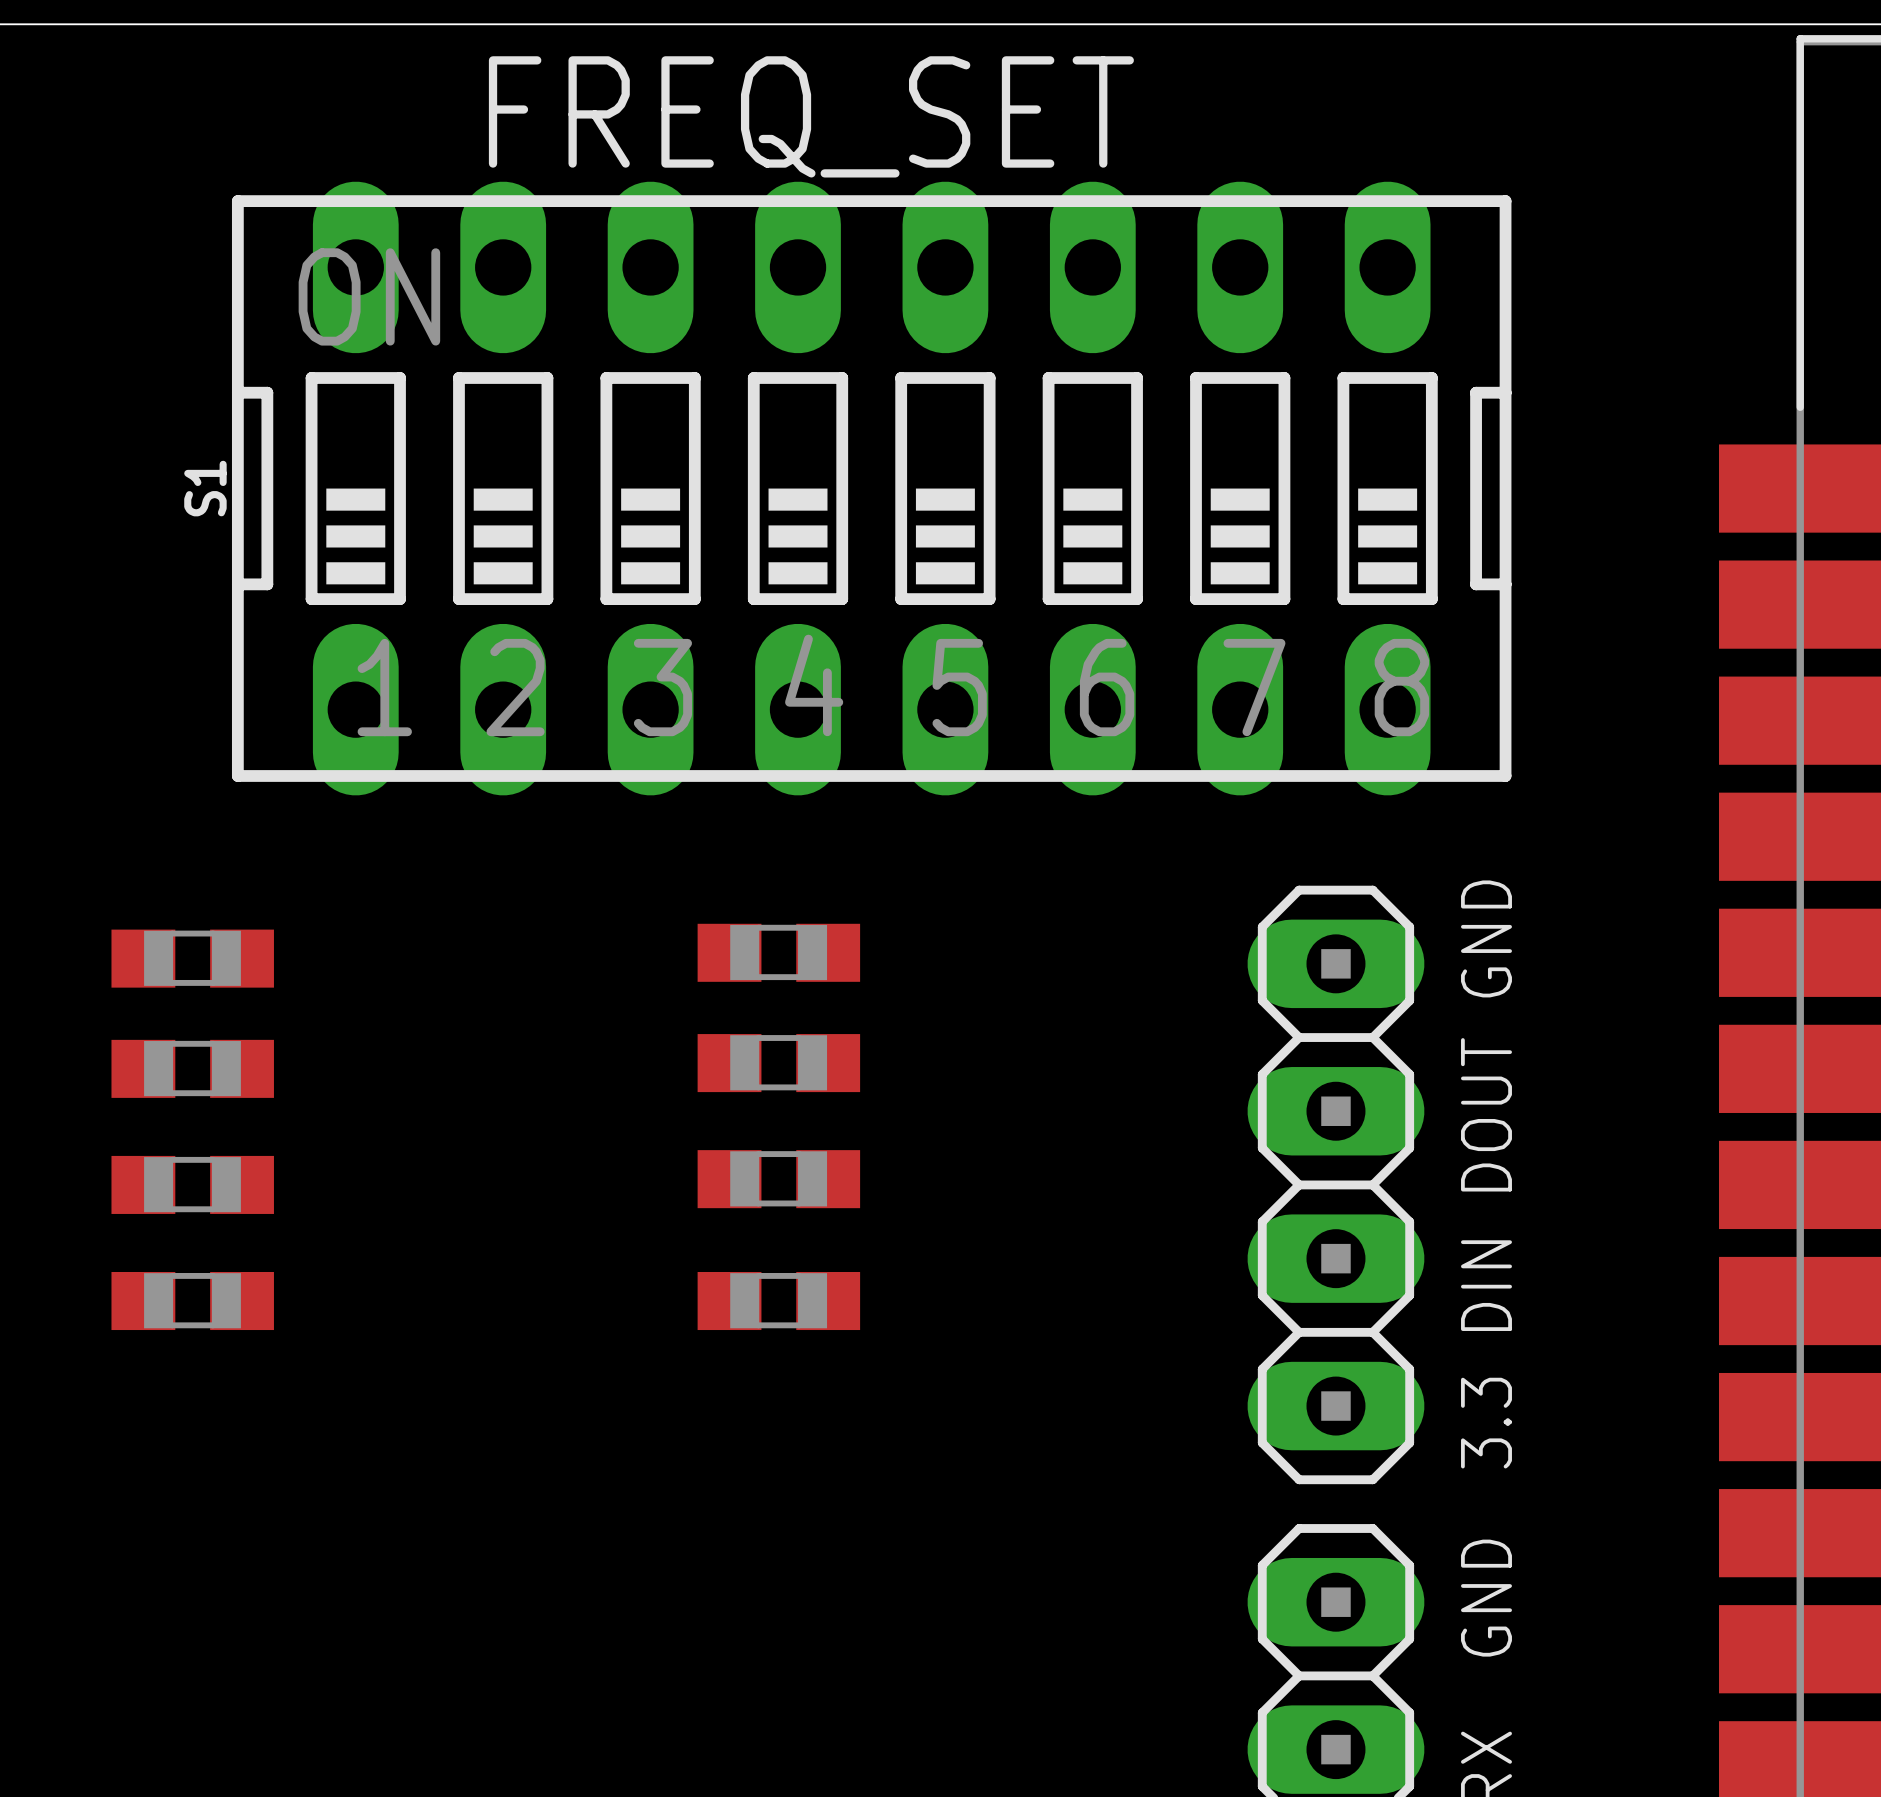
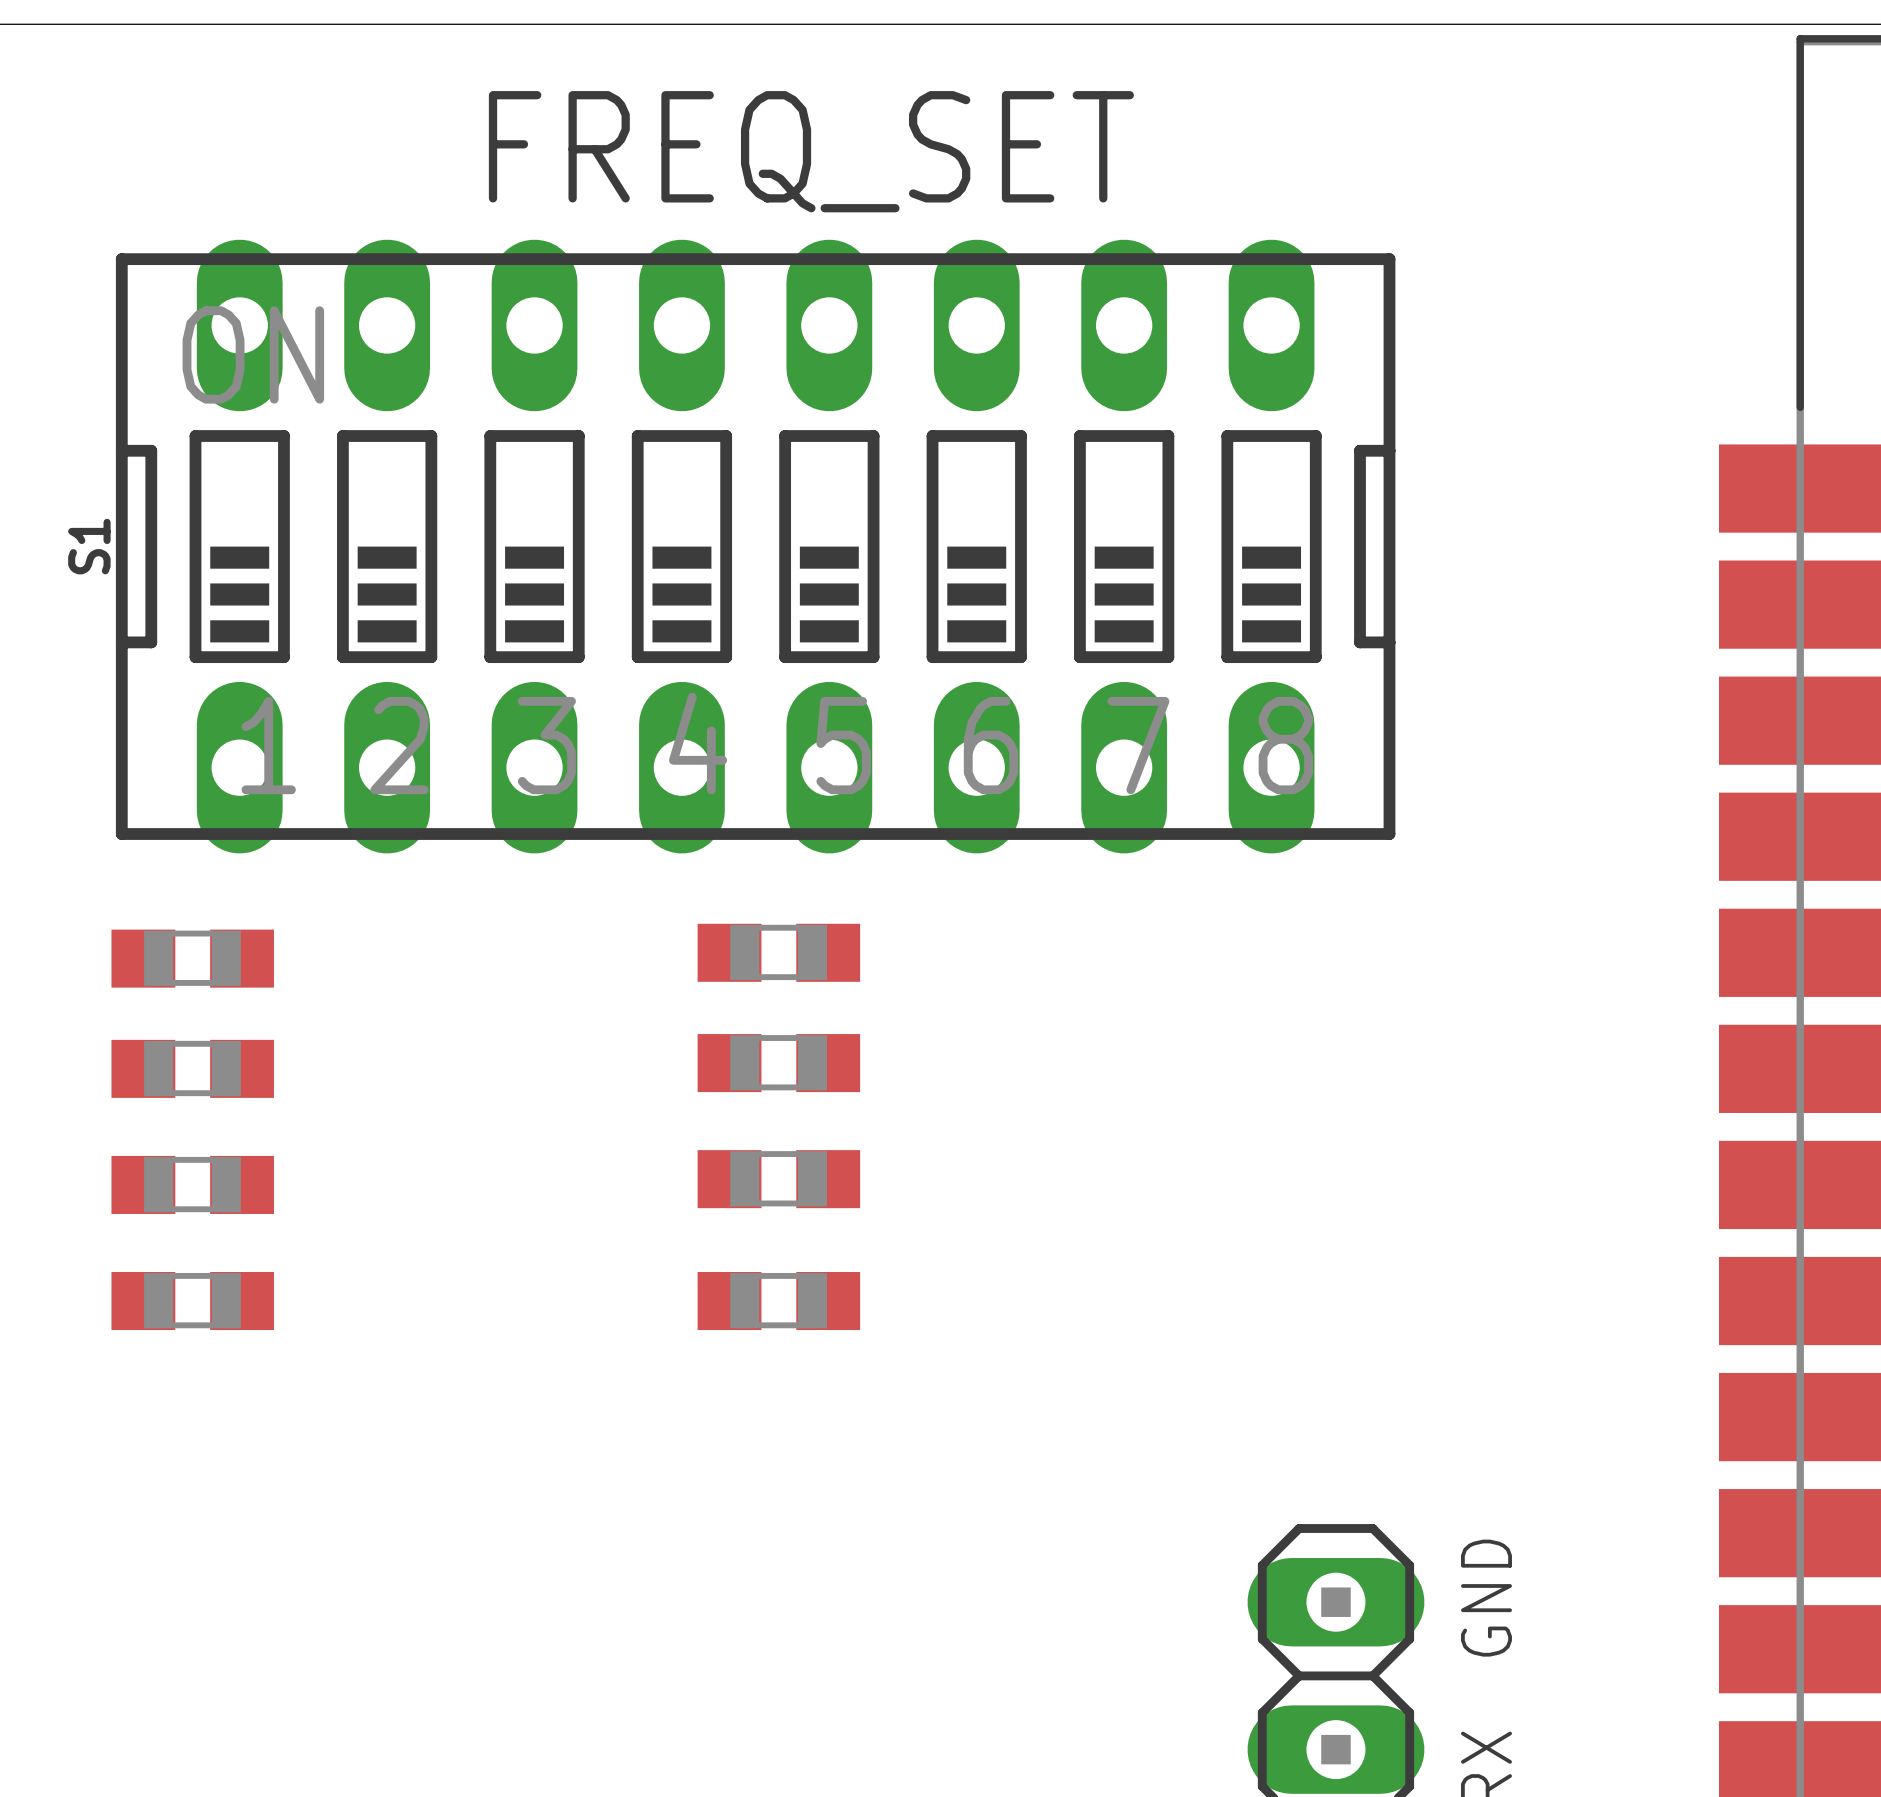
text position: FREQ_SET (811, 116) -> FREQ_SET (811, 151)
S1 position: (871, 488) -> (755, 546)
text: 3.3 DIN DOUT GND (1486, 1174) -> none
part: (1335, 1184) -> none

